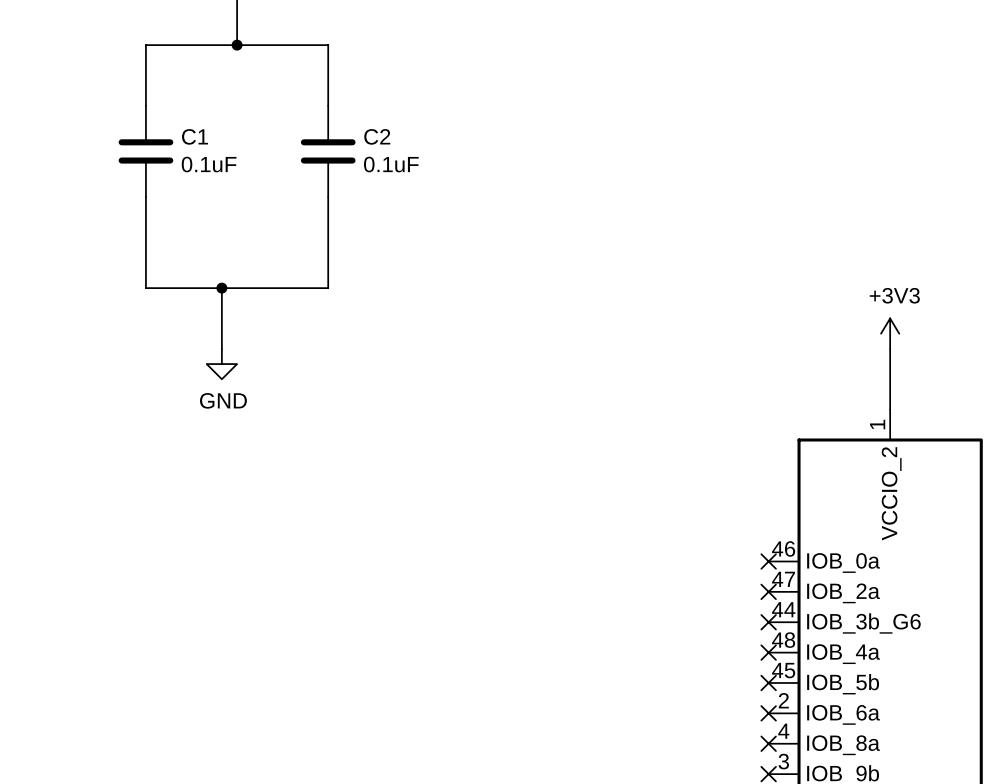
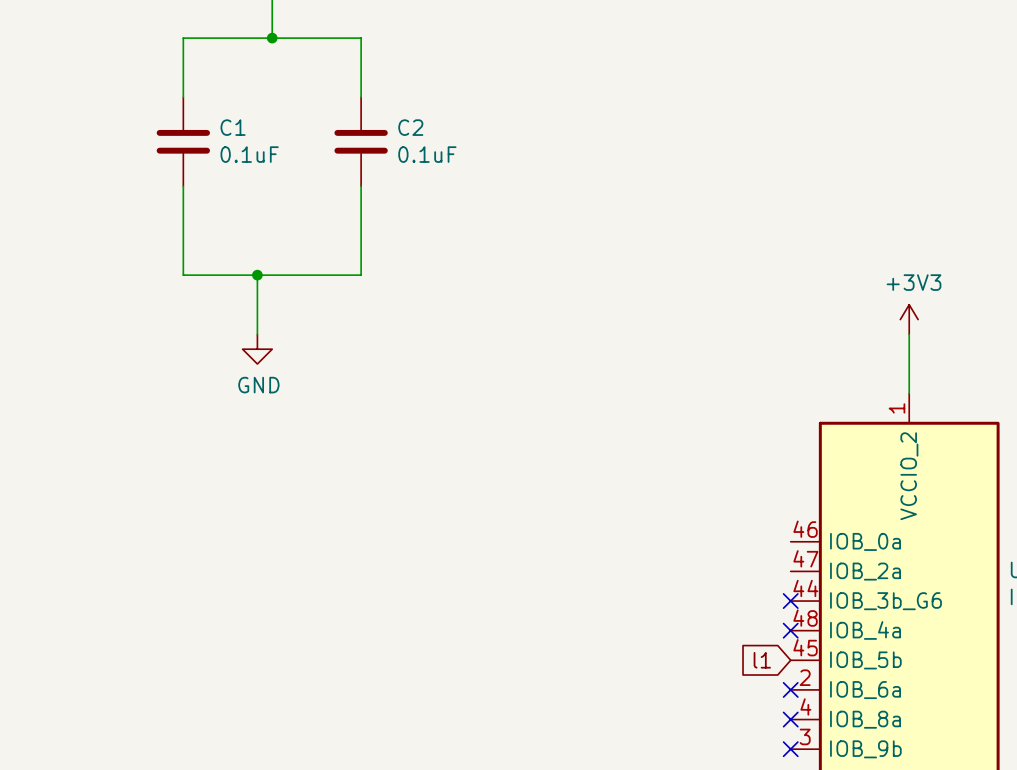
no-connect mark: (768, 561) -> none
no-connect mark: (768, 591) -> none
global label: none -> l1 (762, 660)
no-connect mark: (768, 682) -> none

